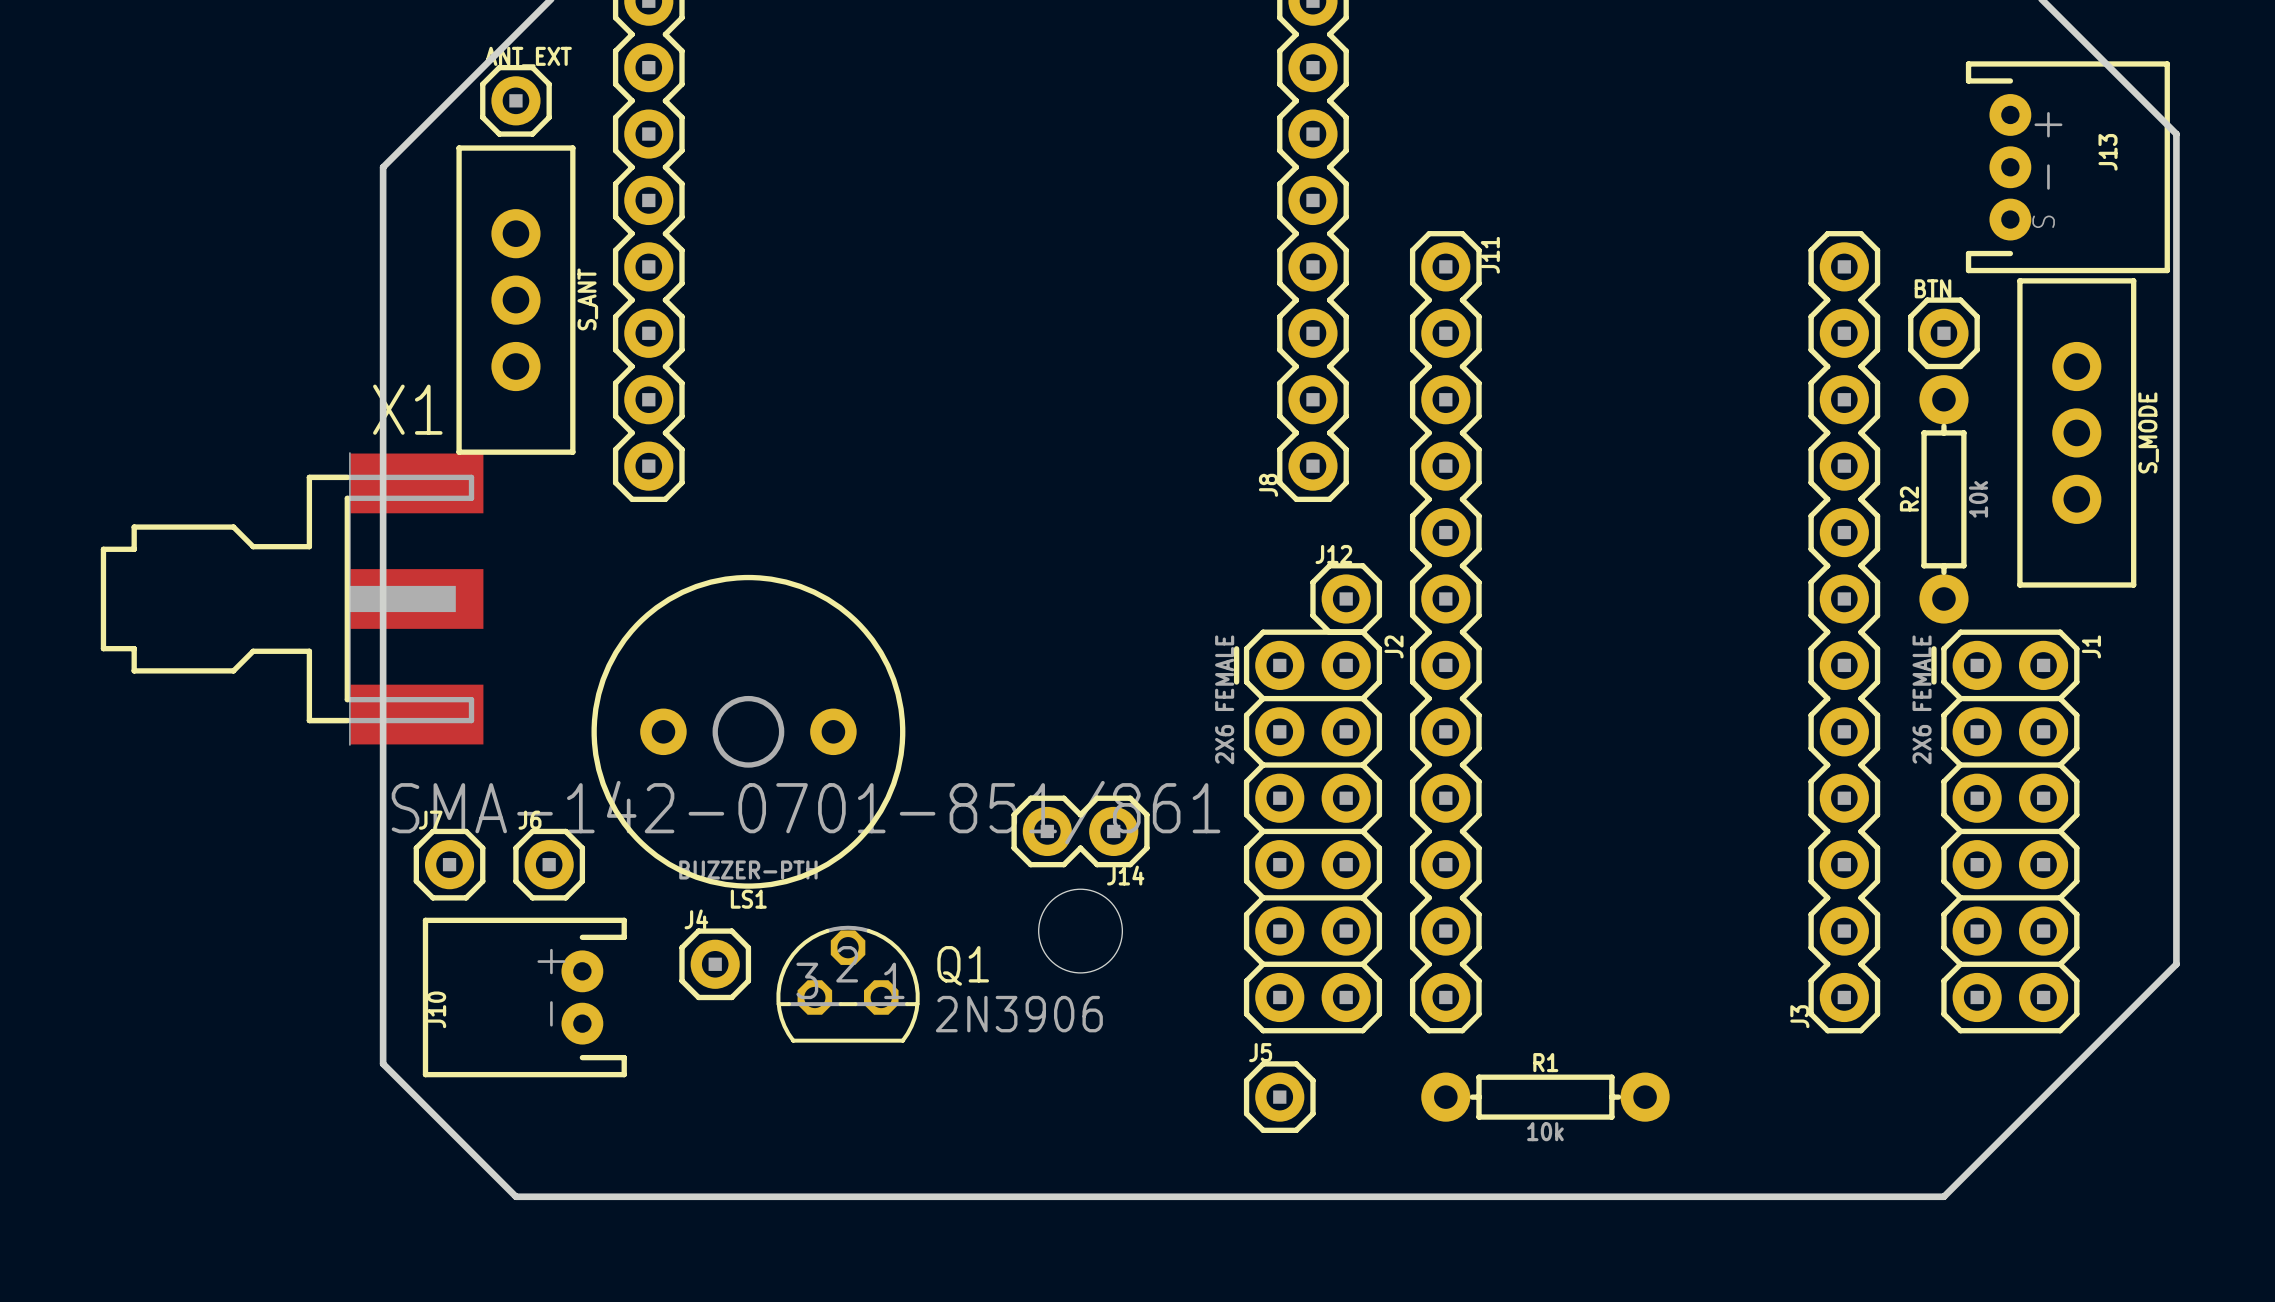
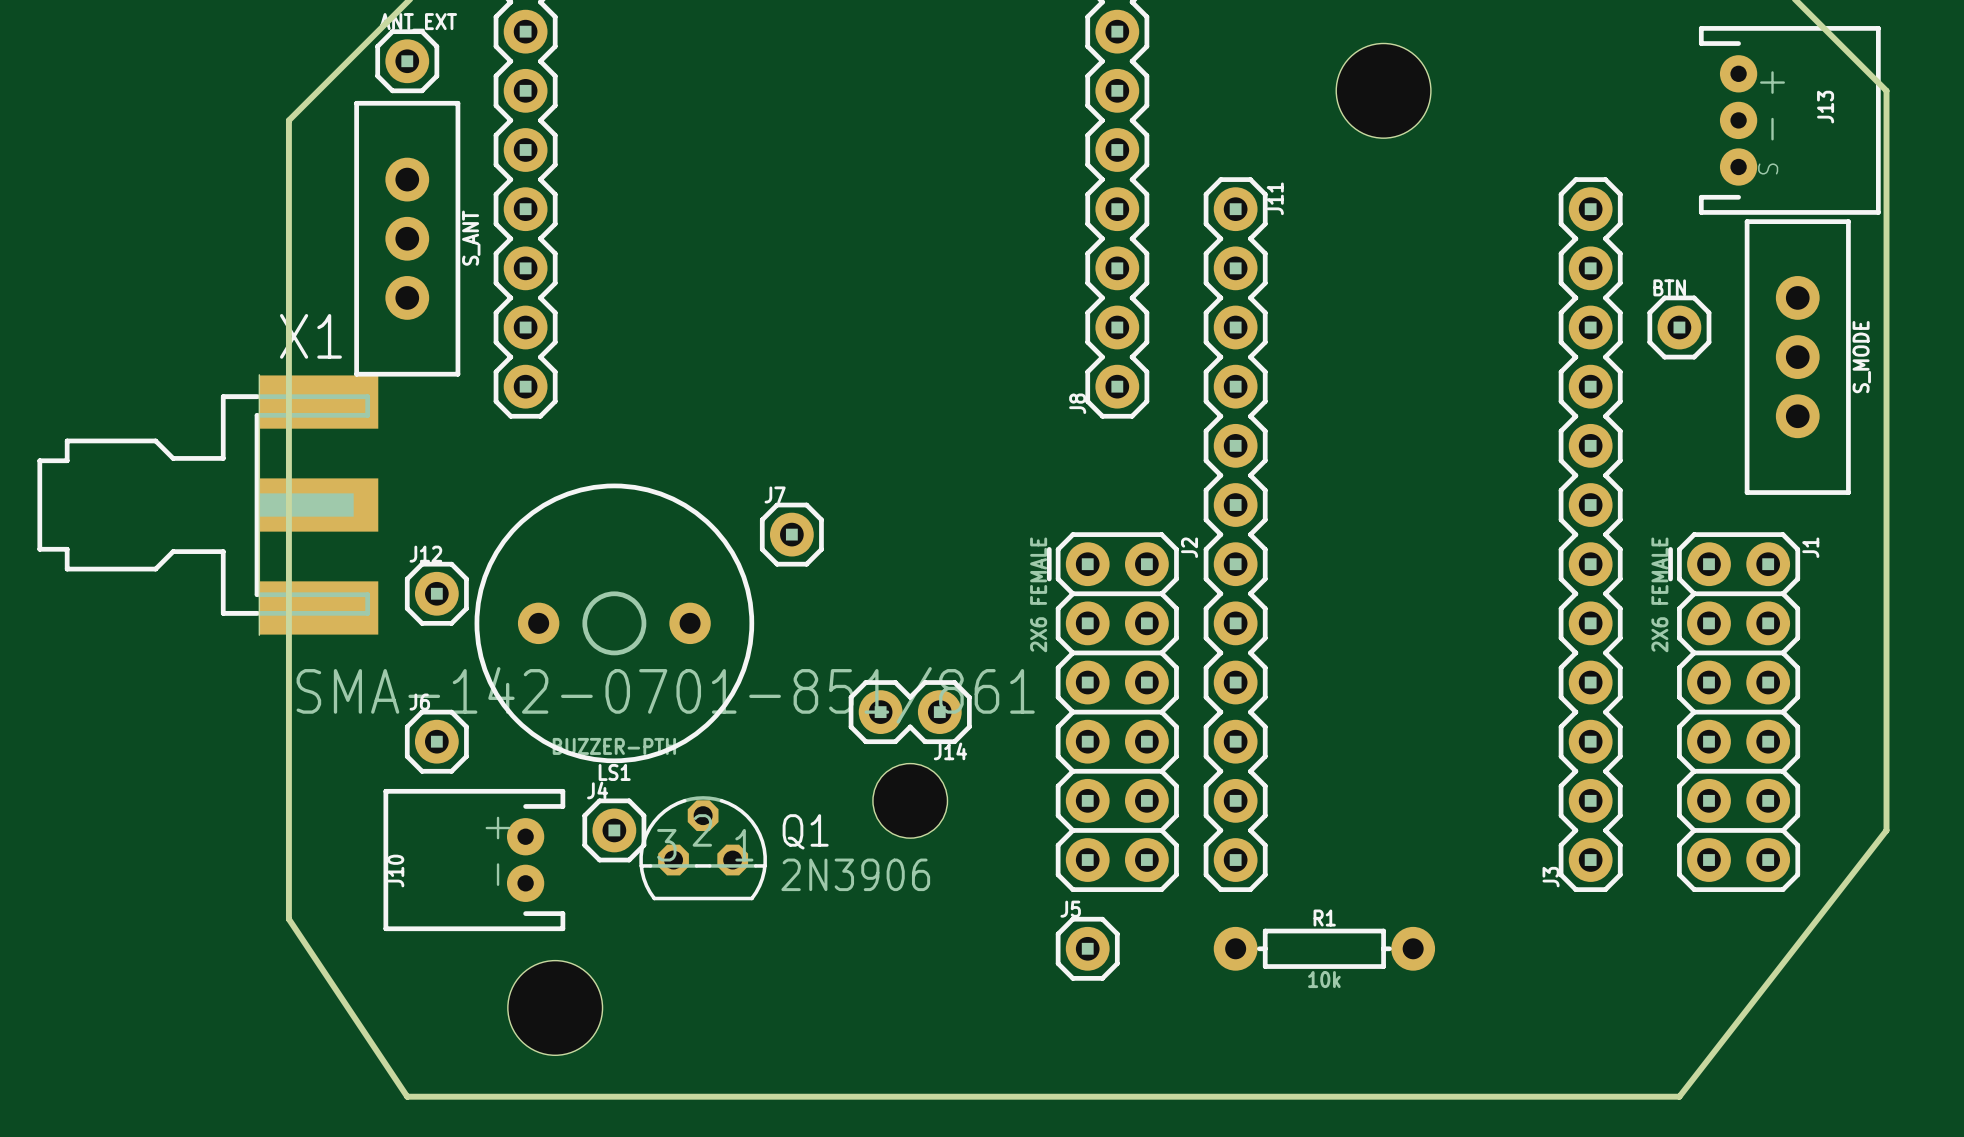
hole: none -> (1383, 90)
BTN position: (1943, 333) -> (1679, 327)
R2: 10k (1943, 499) -> none
J12 position: (1346, 598) -> (436, 593)
J7 position: (449, 864) -> (791, 534)
J4 position: (715, 964) -> (614, 830)
board edge: (2176, 964) (1943, 1196) (515, 1196) (383, 1063) -> (1886, 830) (1679, 1096) (407, 1096) (288, 919)
J10 position: (524, 997) -> (474, 860)
hole: none -> (555, 1007)

